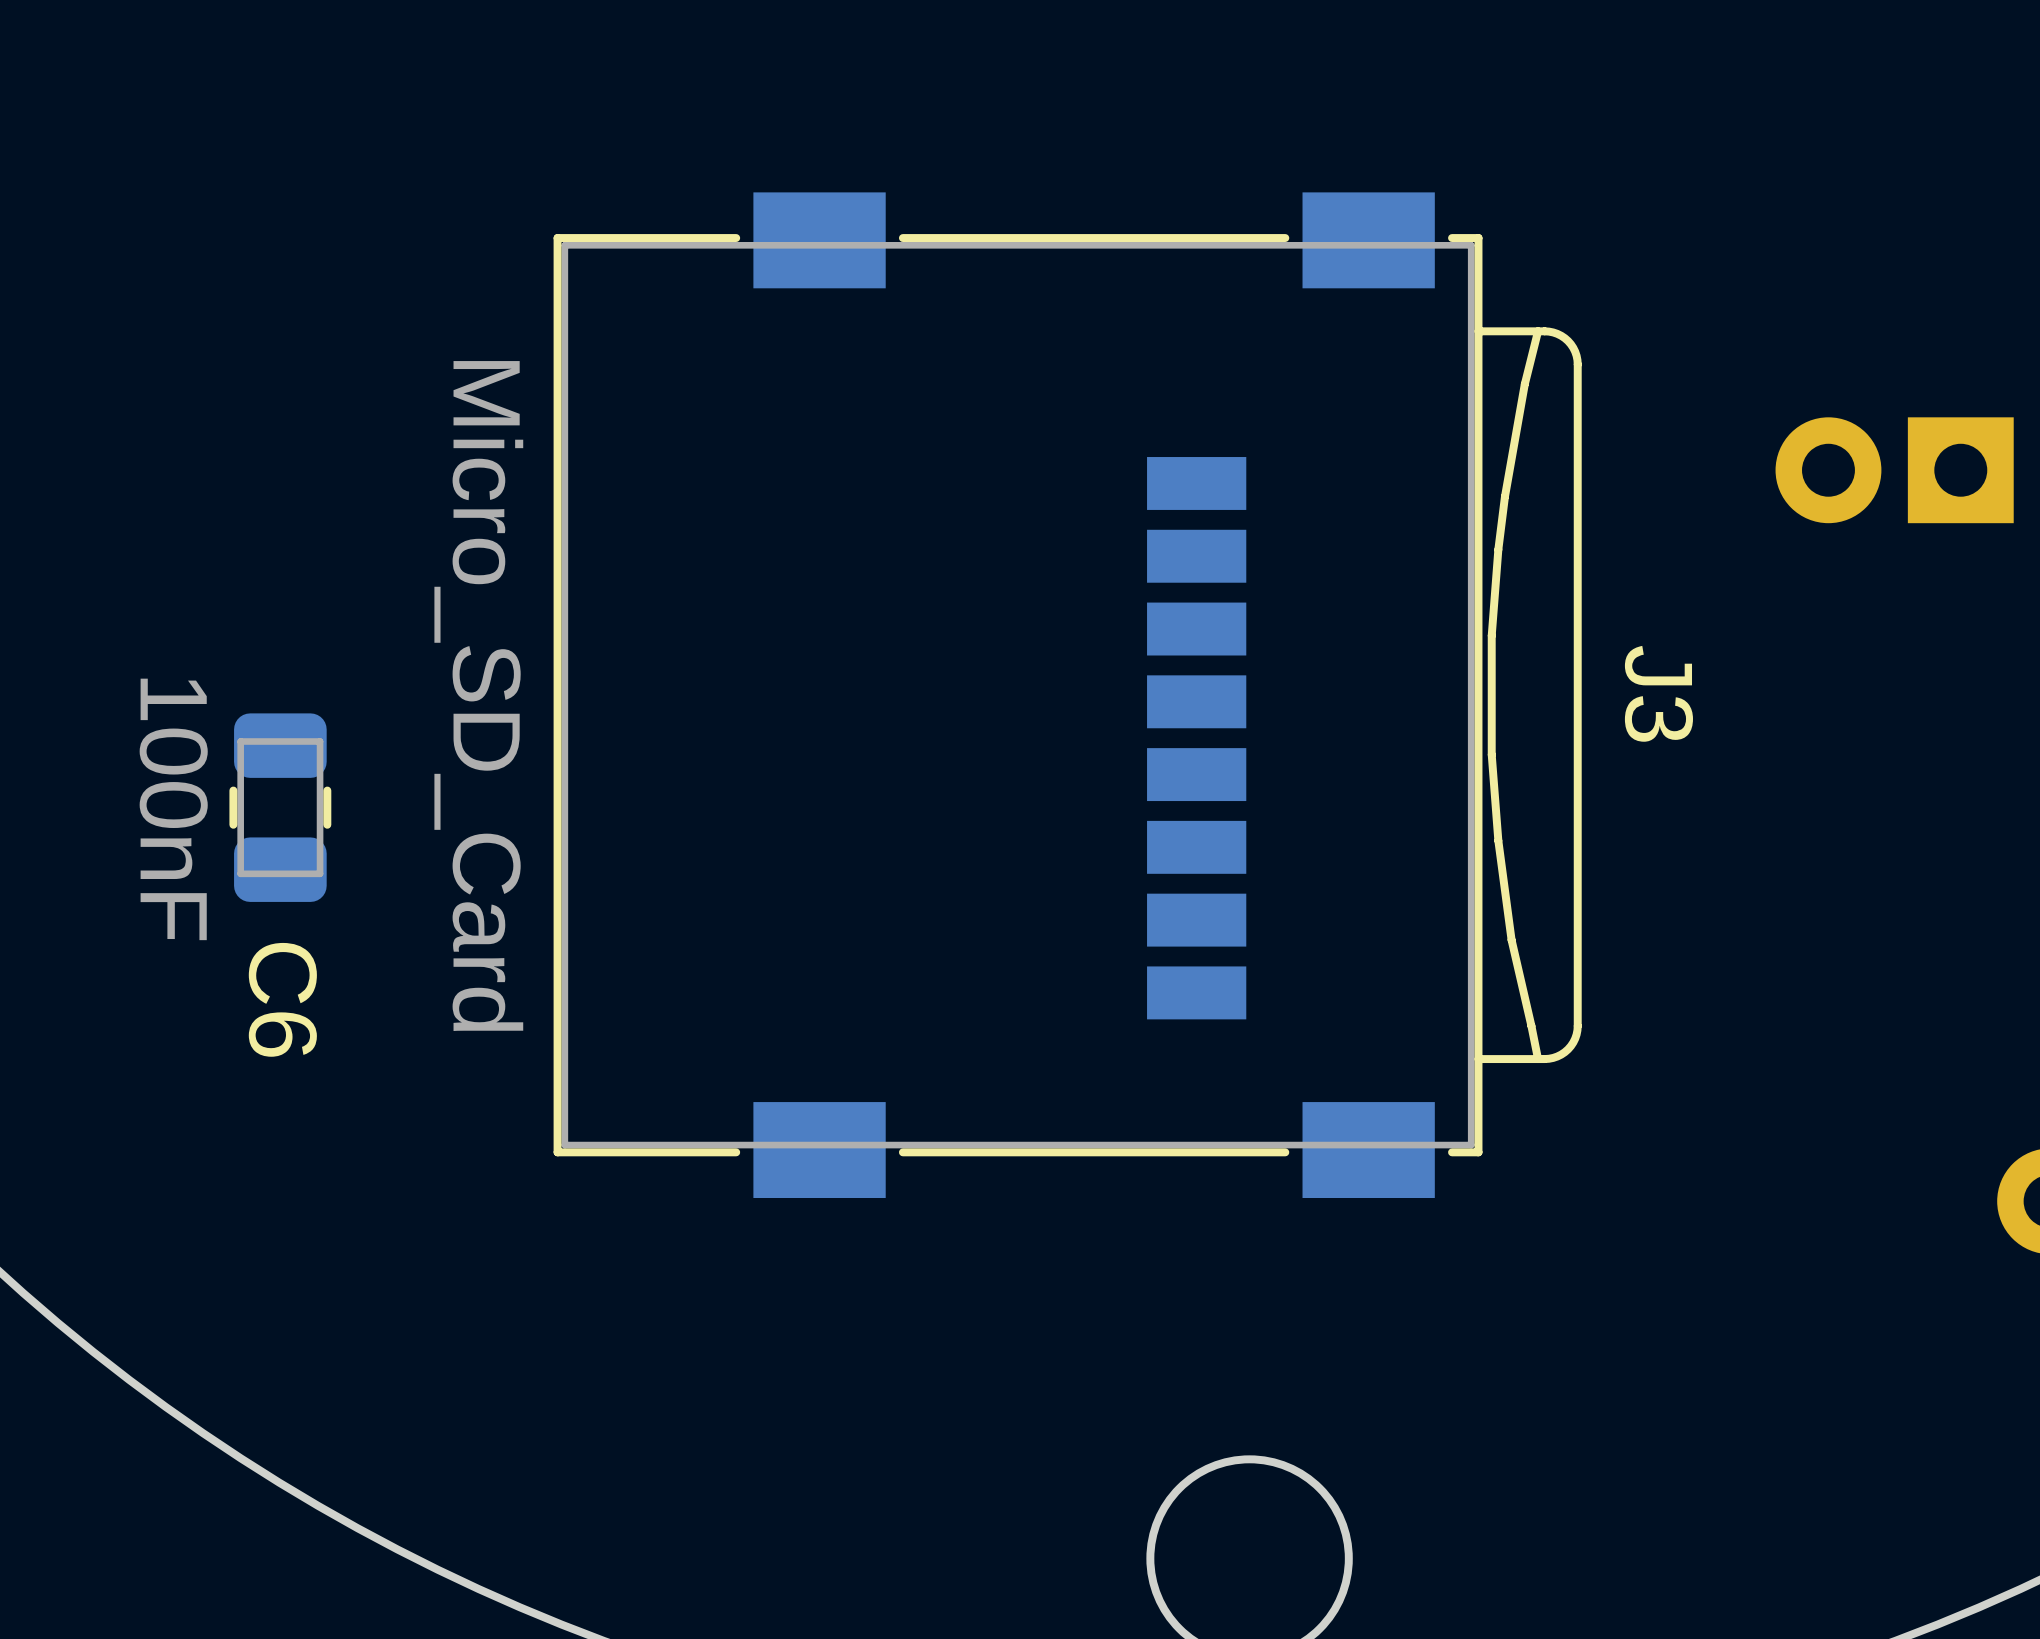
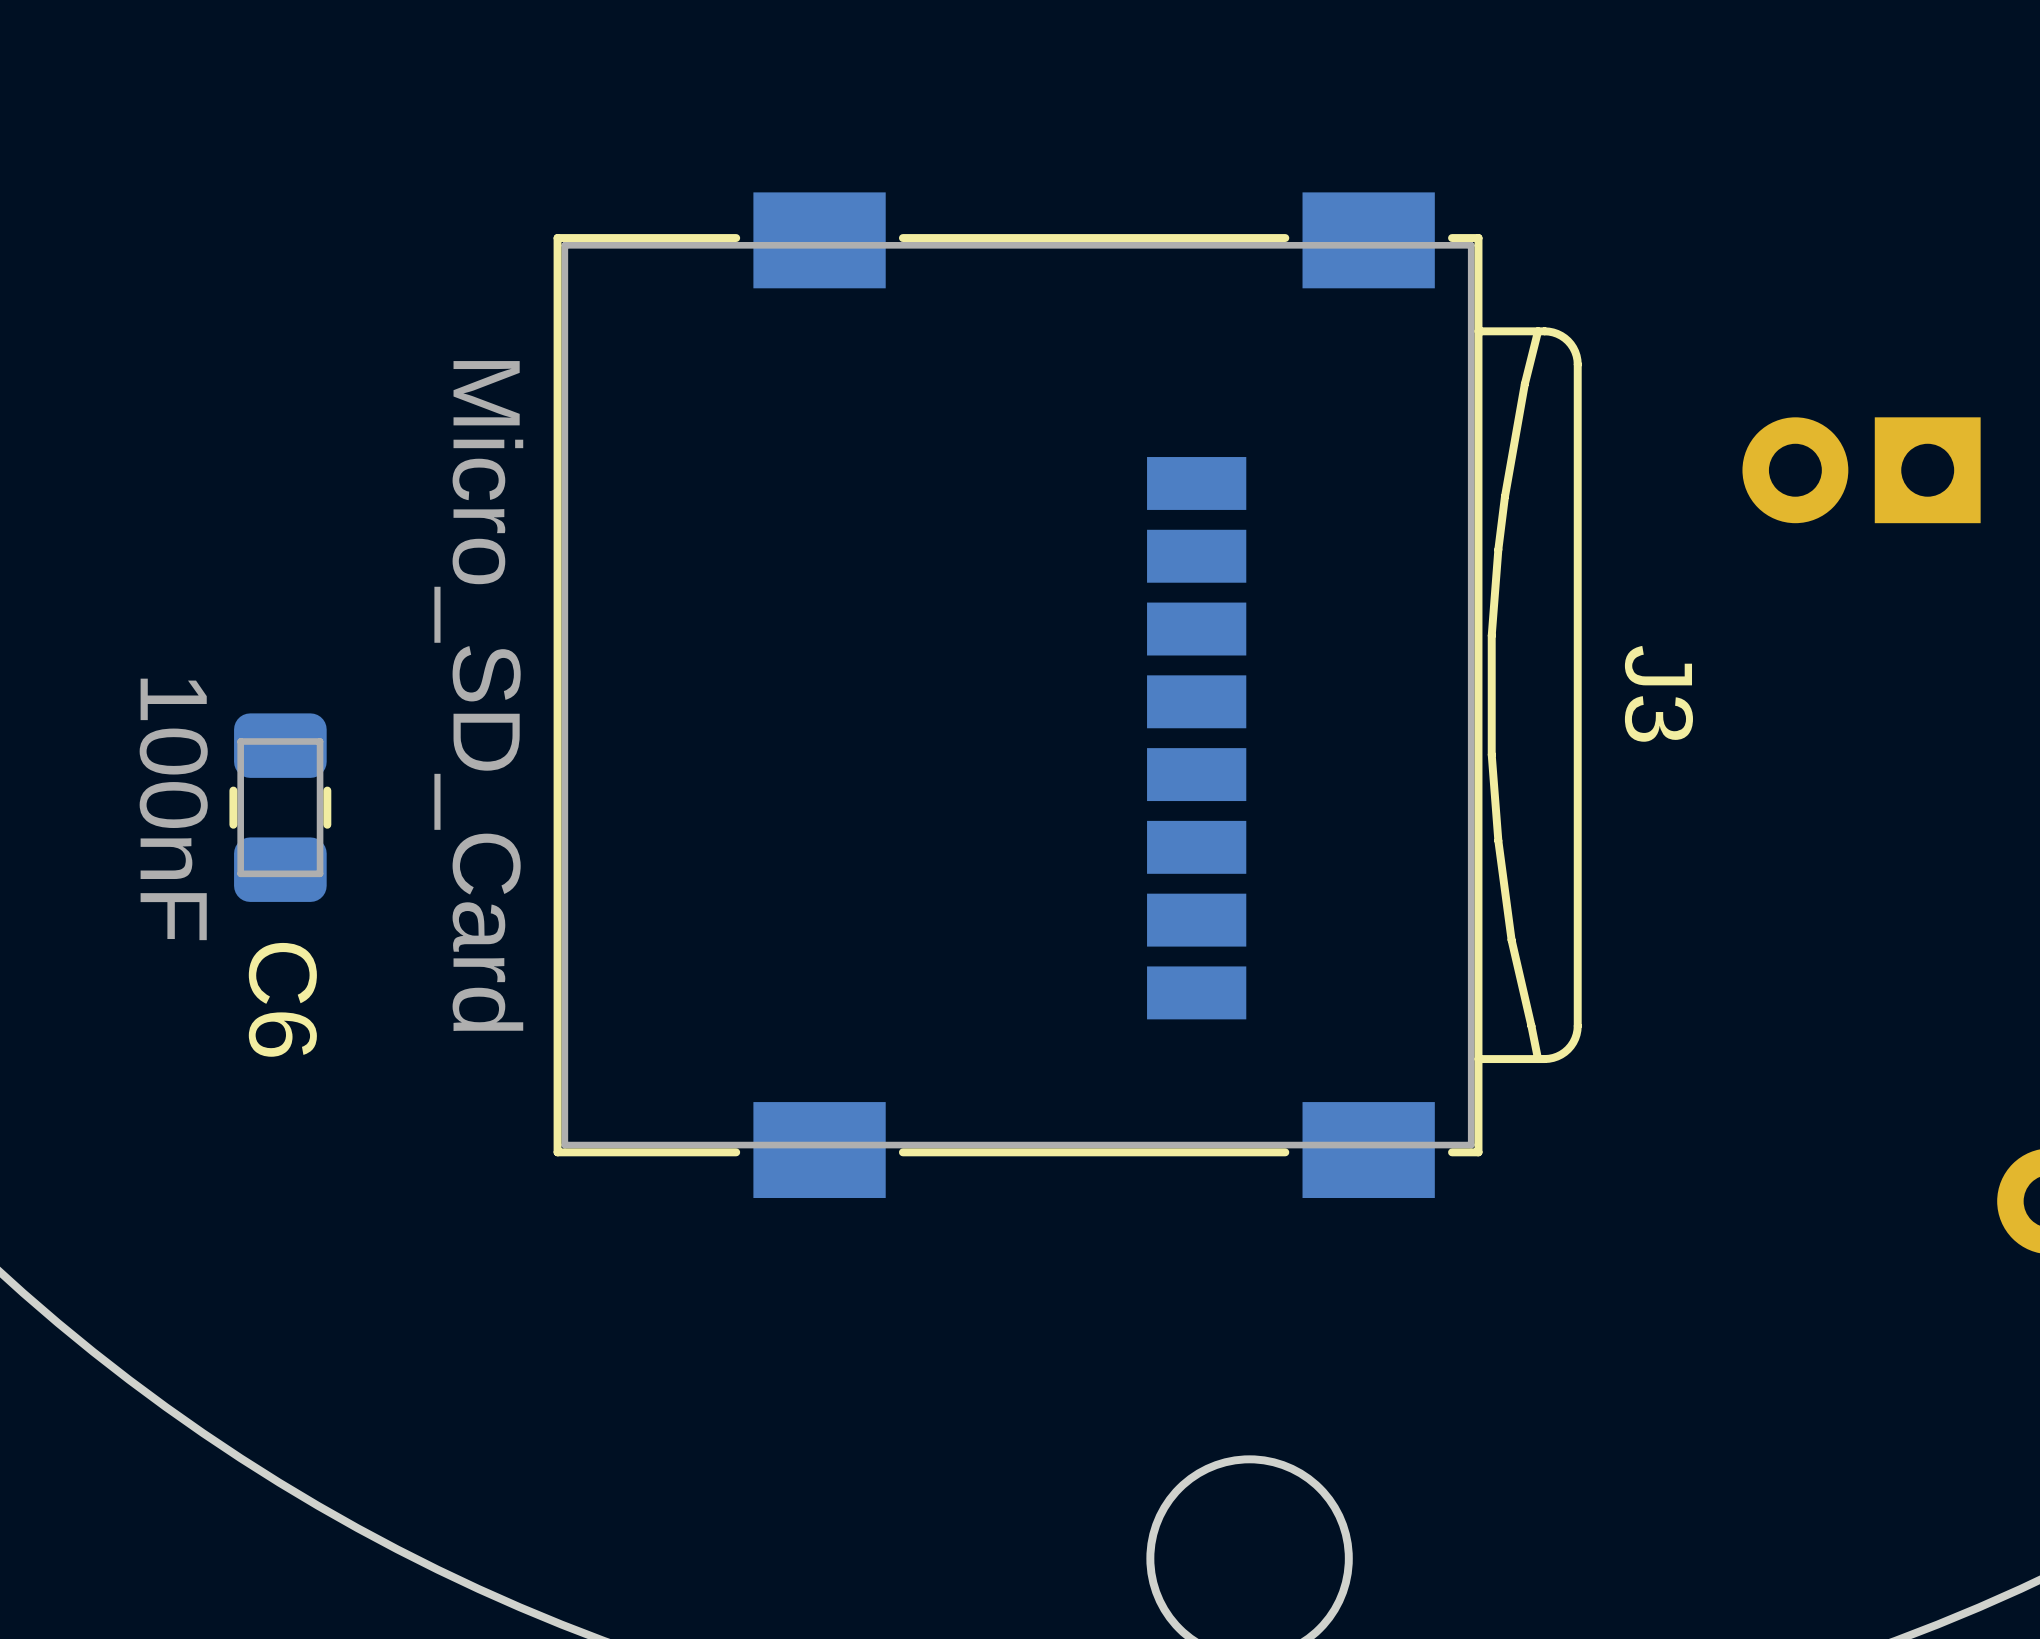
part position: (1894, 470) -> (1861, 470)

